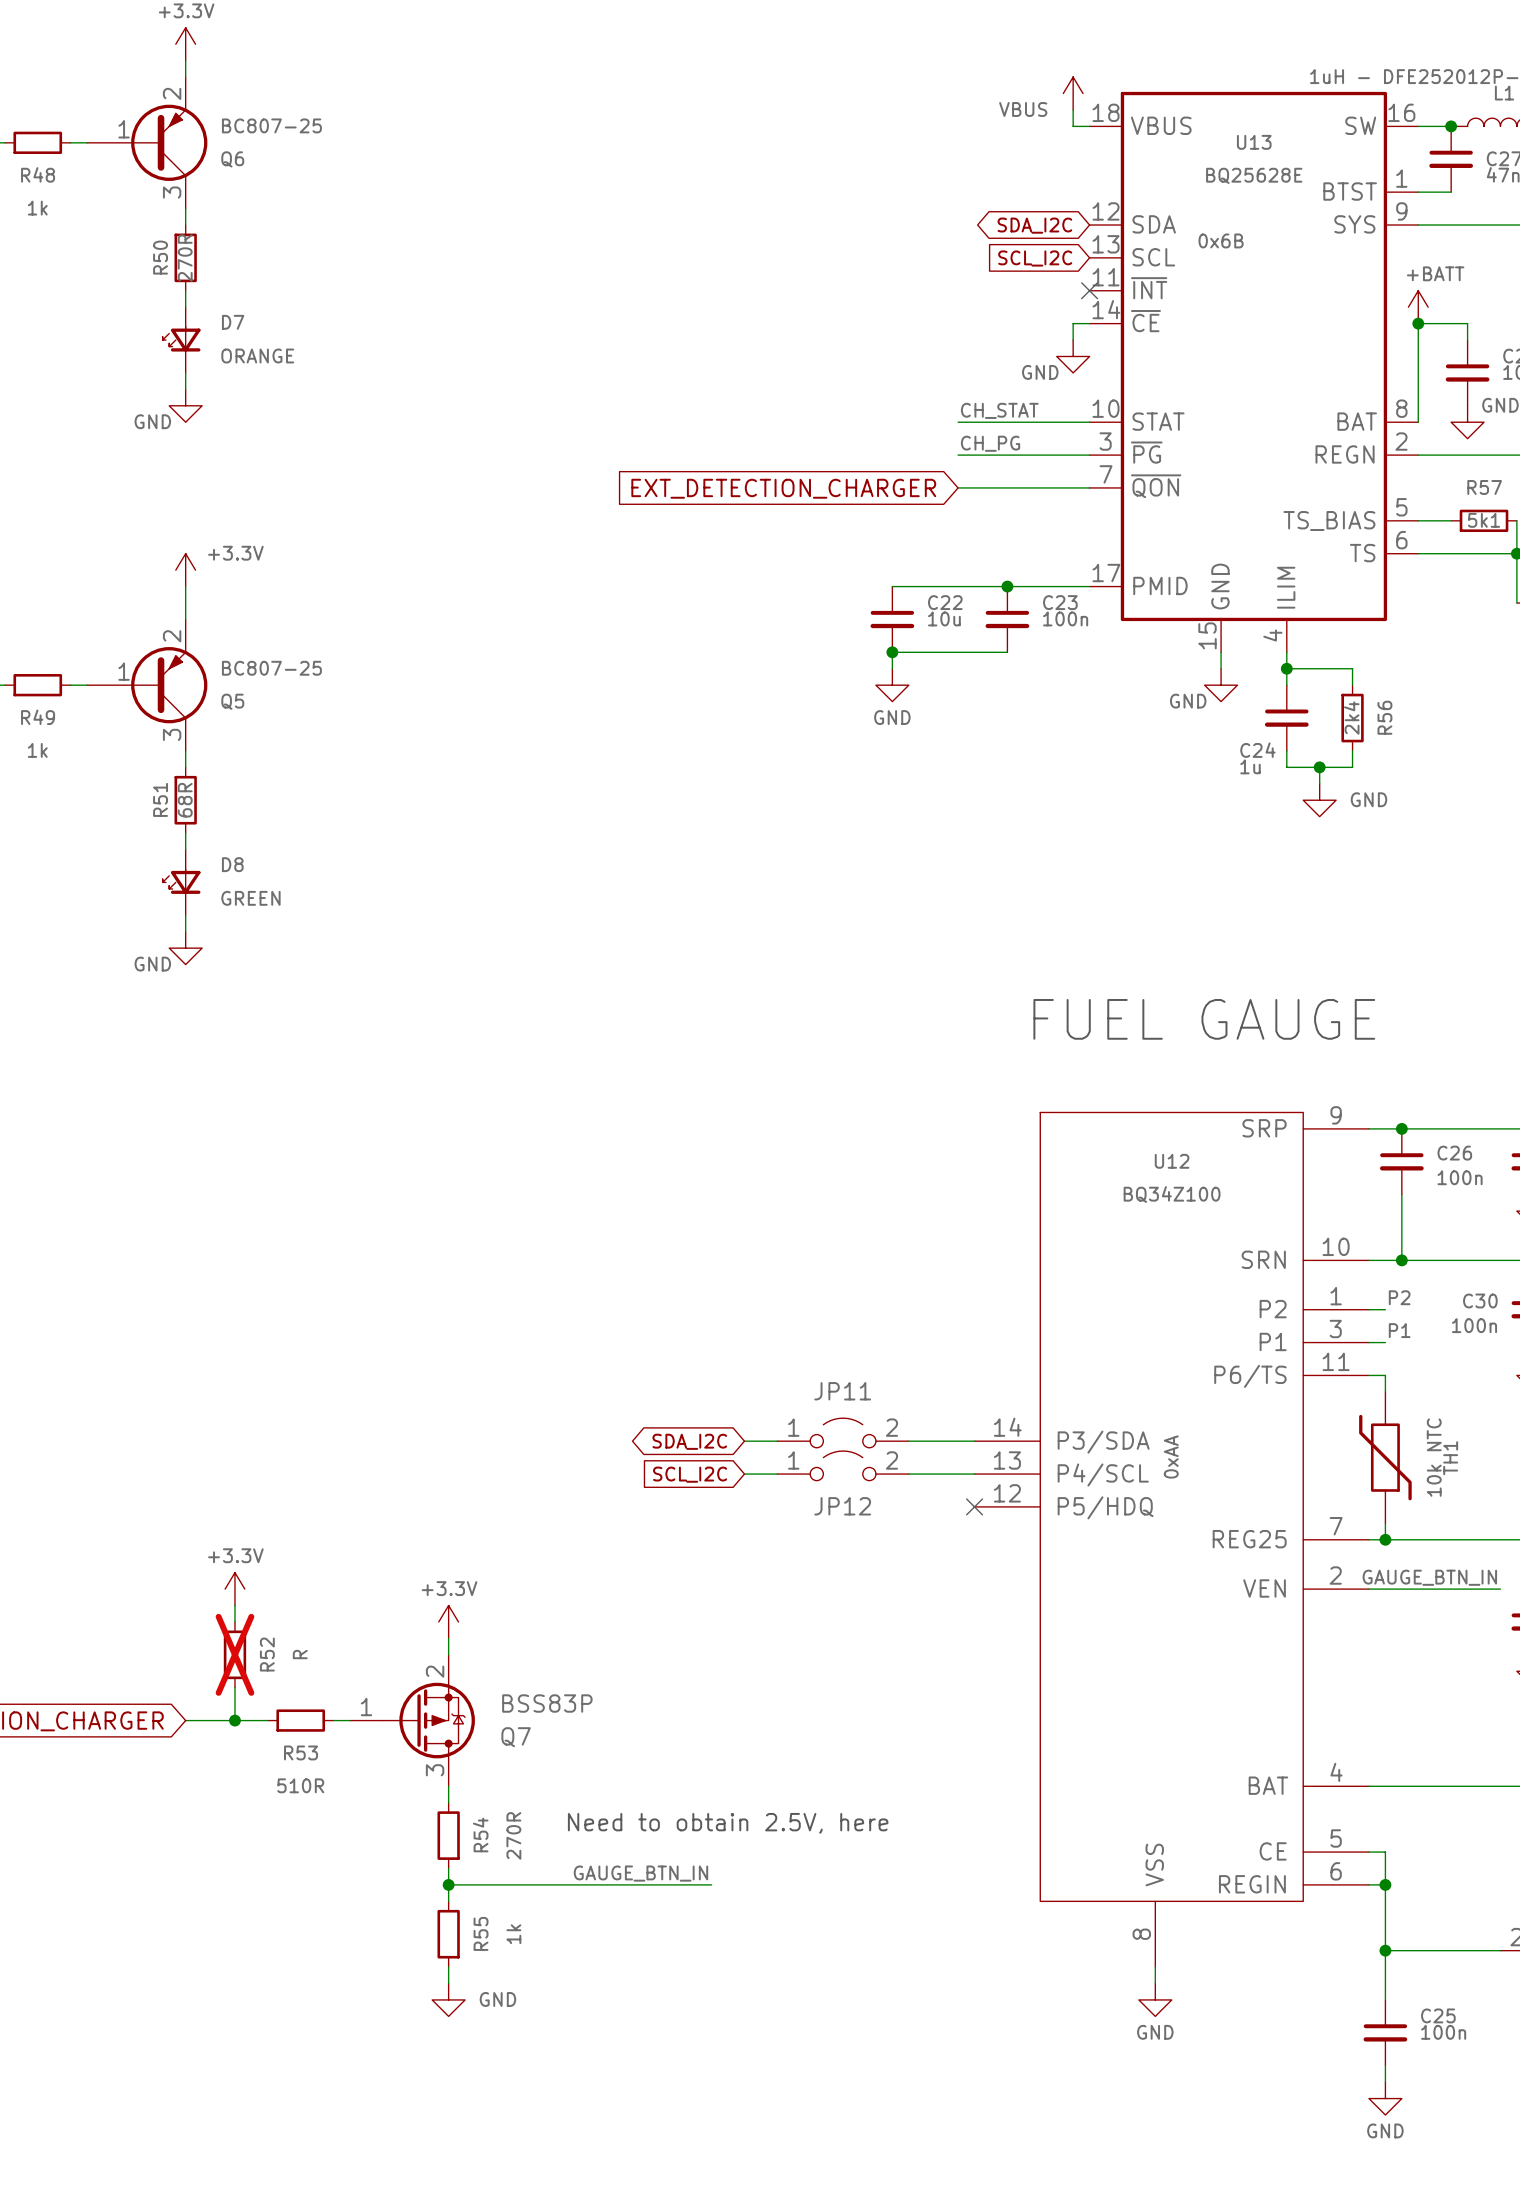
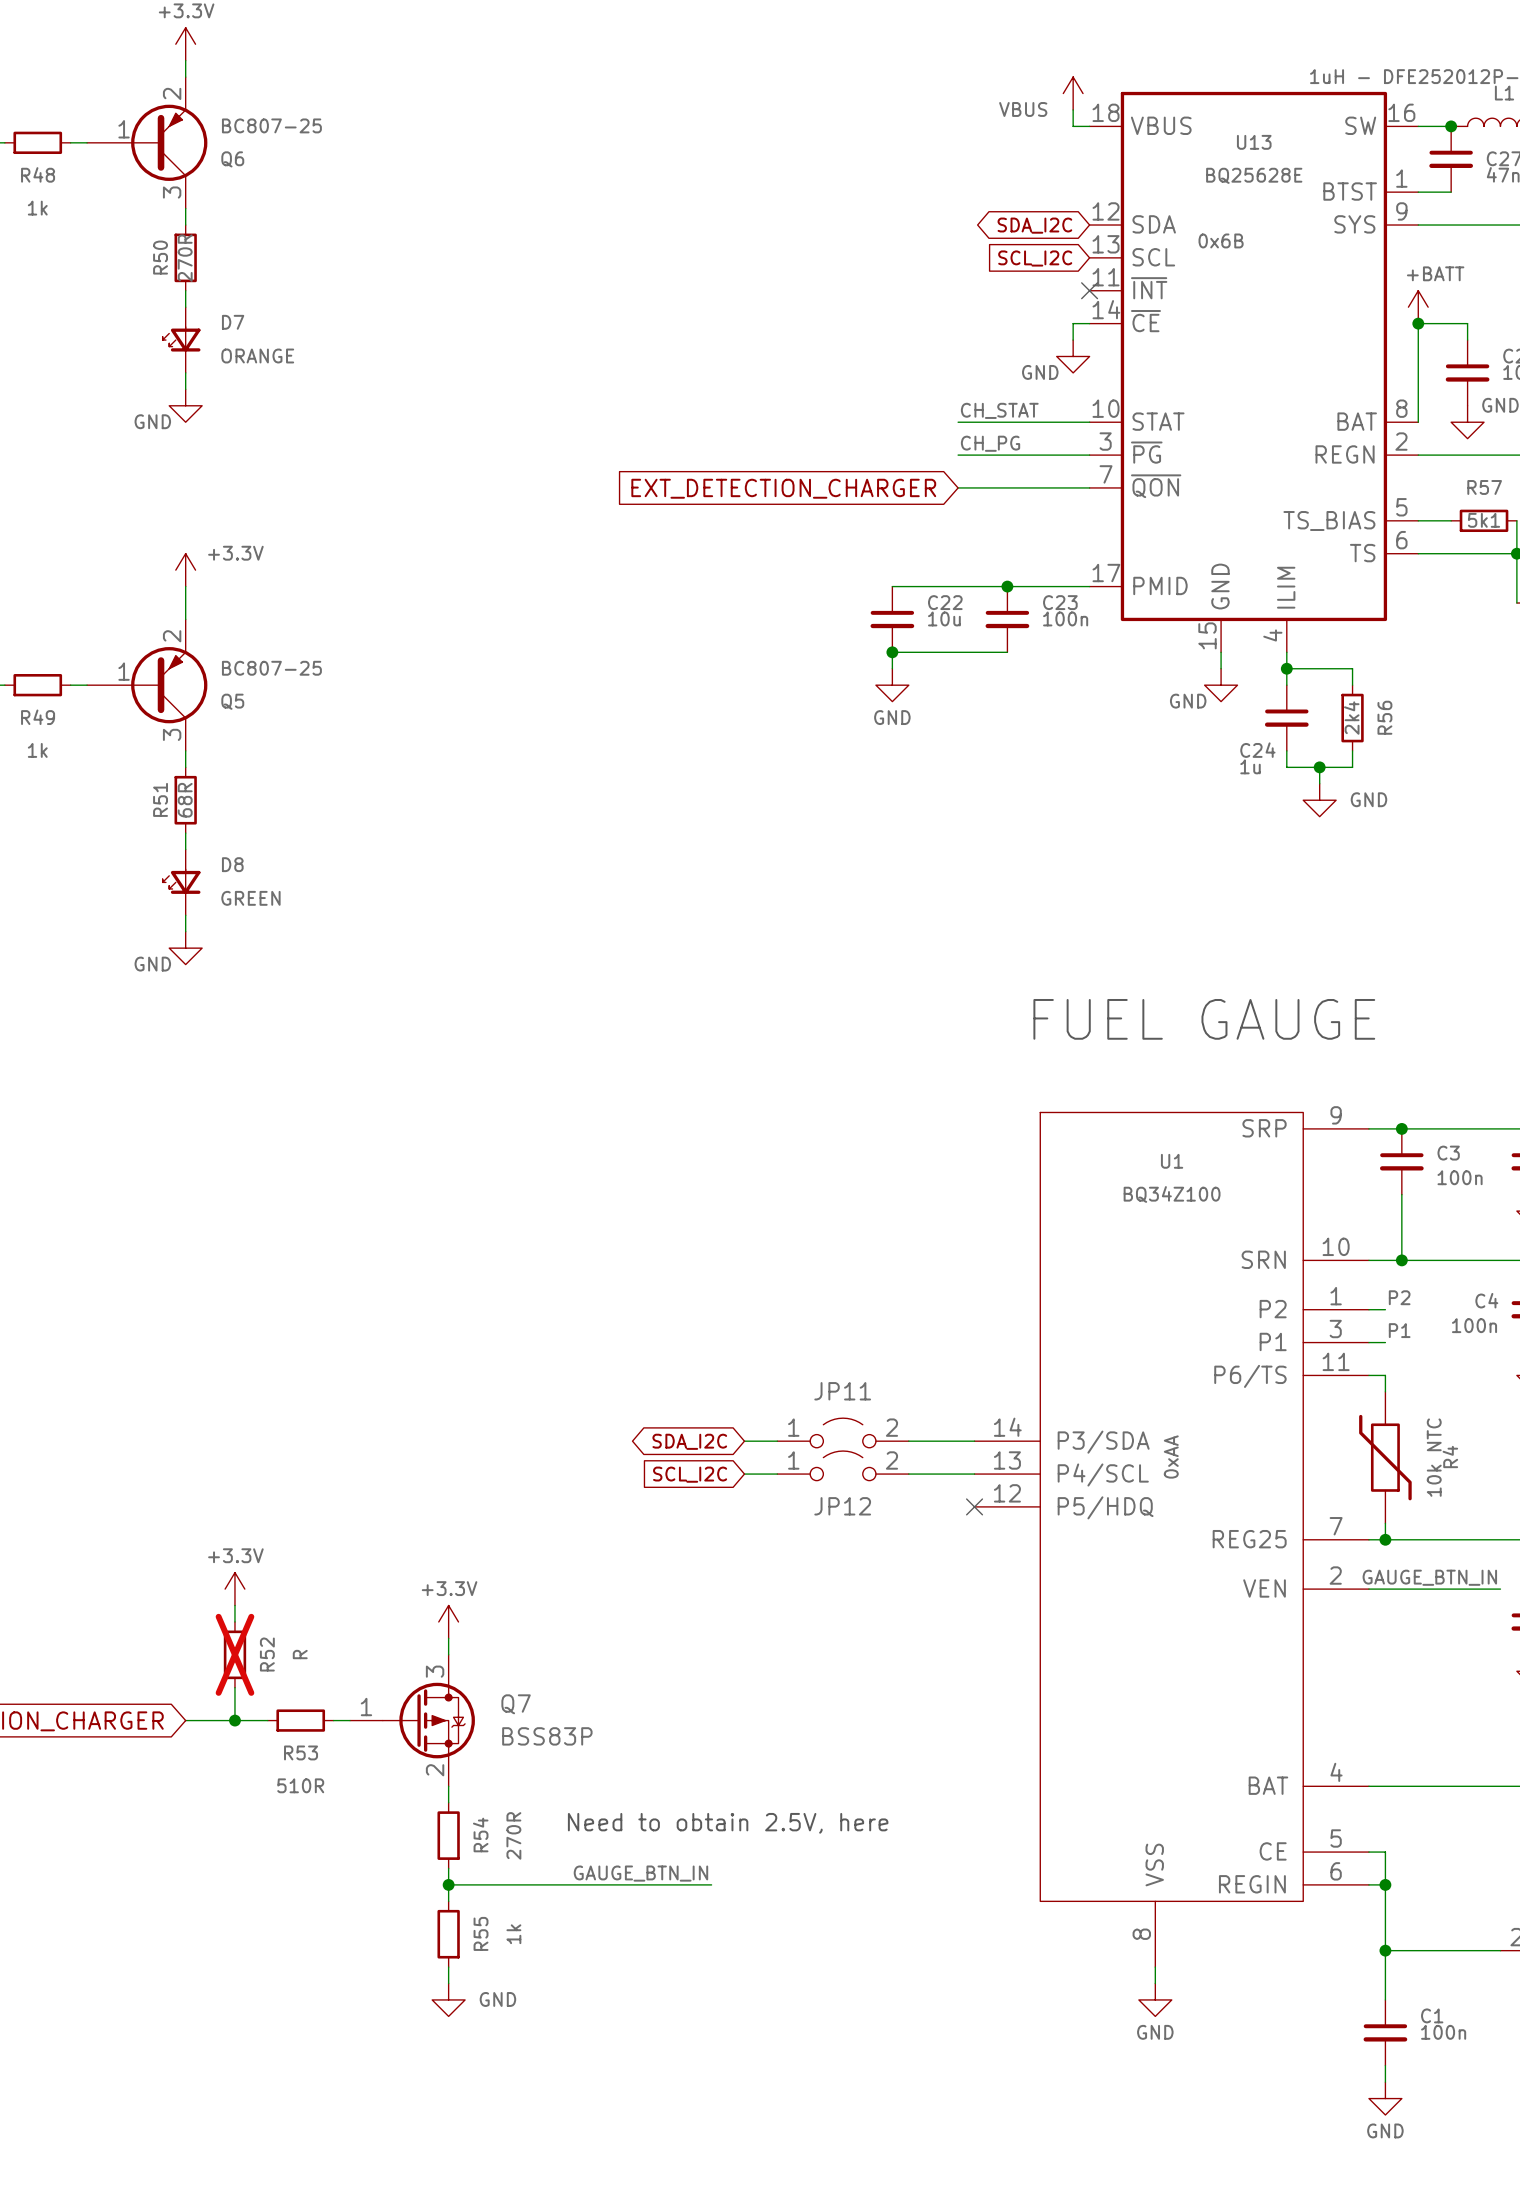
C26 name: C26 (1454, 1153) -> C3 (1448, 1153)
U12 name: U12 (1172, 1161) -> U1 (1172, 1161)
C30 name: C30 (1480, 1301) -> C4 (1486, 1300)
TH1 name: TH1 (1450, 1458) -> R4 (1450, 1457)
Q7 flip: as is (428, 1720) -> up-down (428, 1720)
C25 name: C25 (1438, 2015) -> C1 (1432, 2015)

